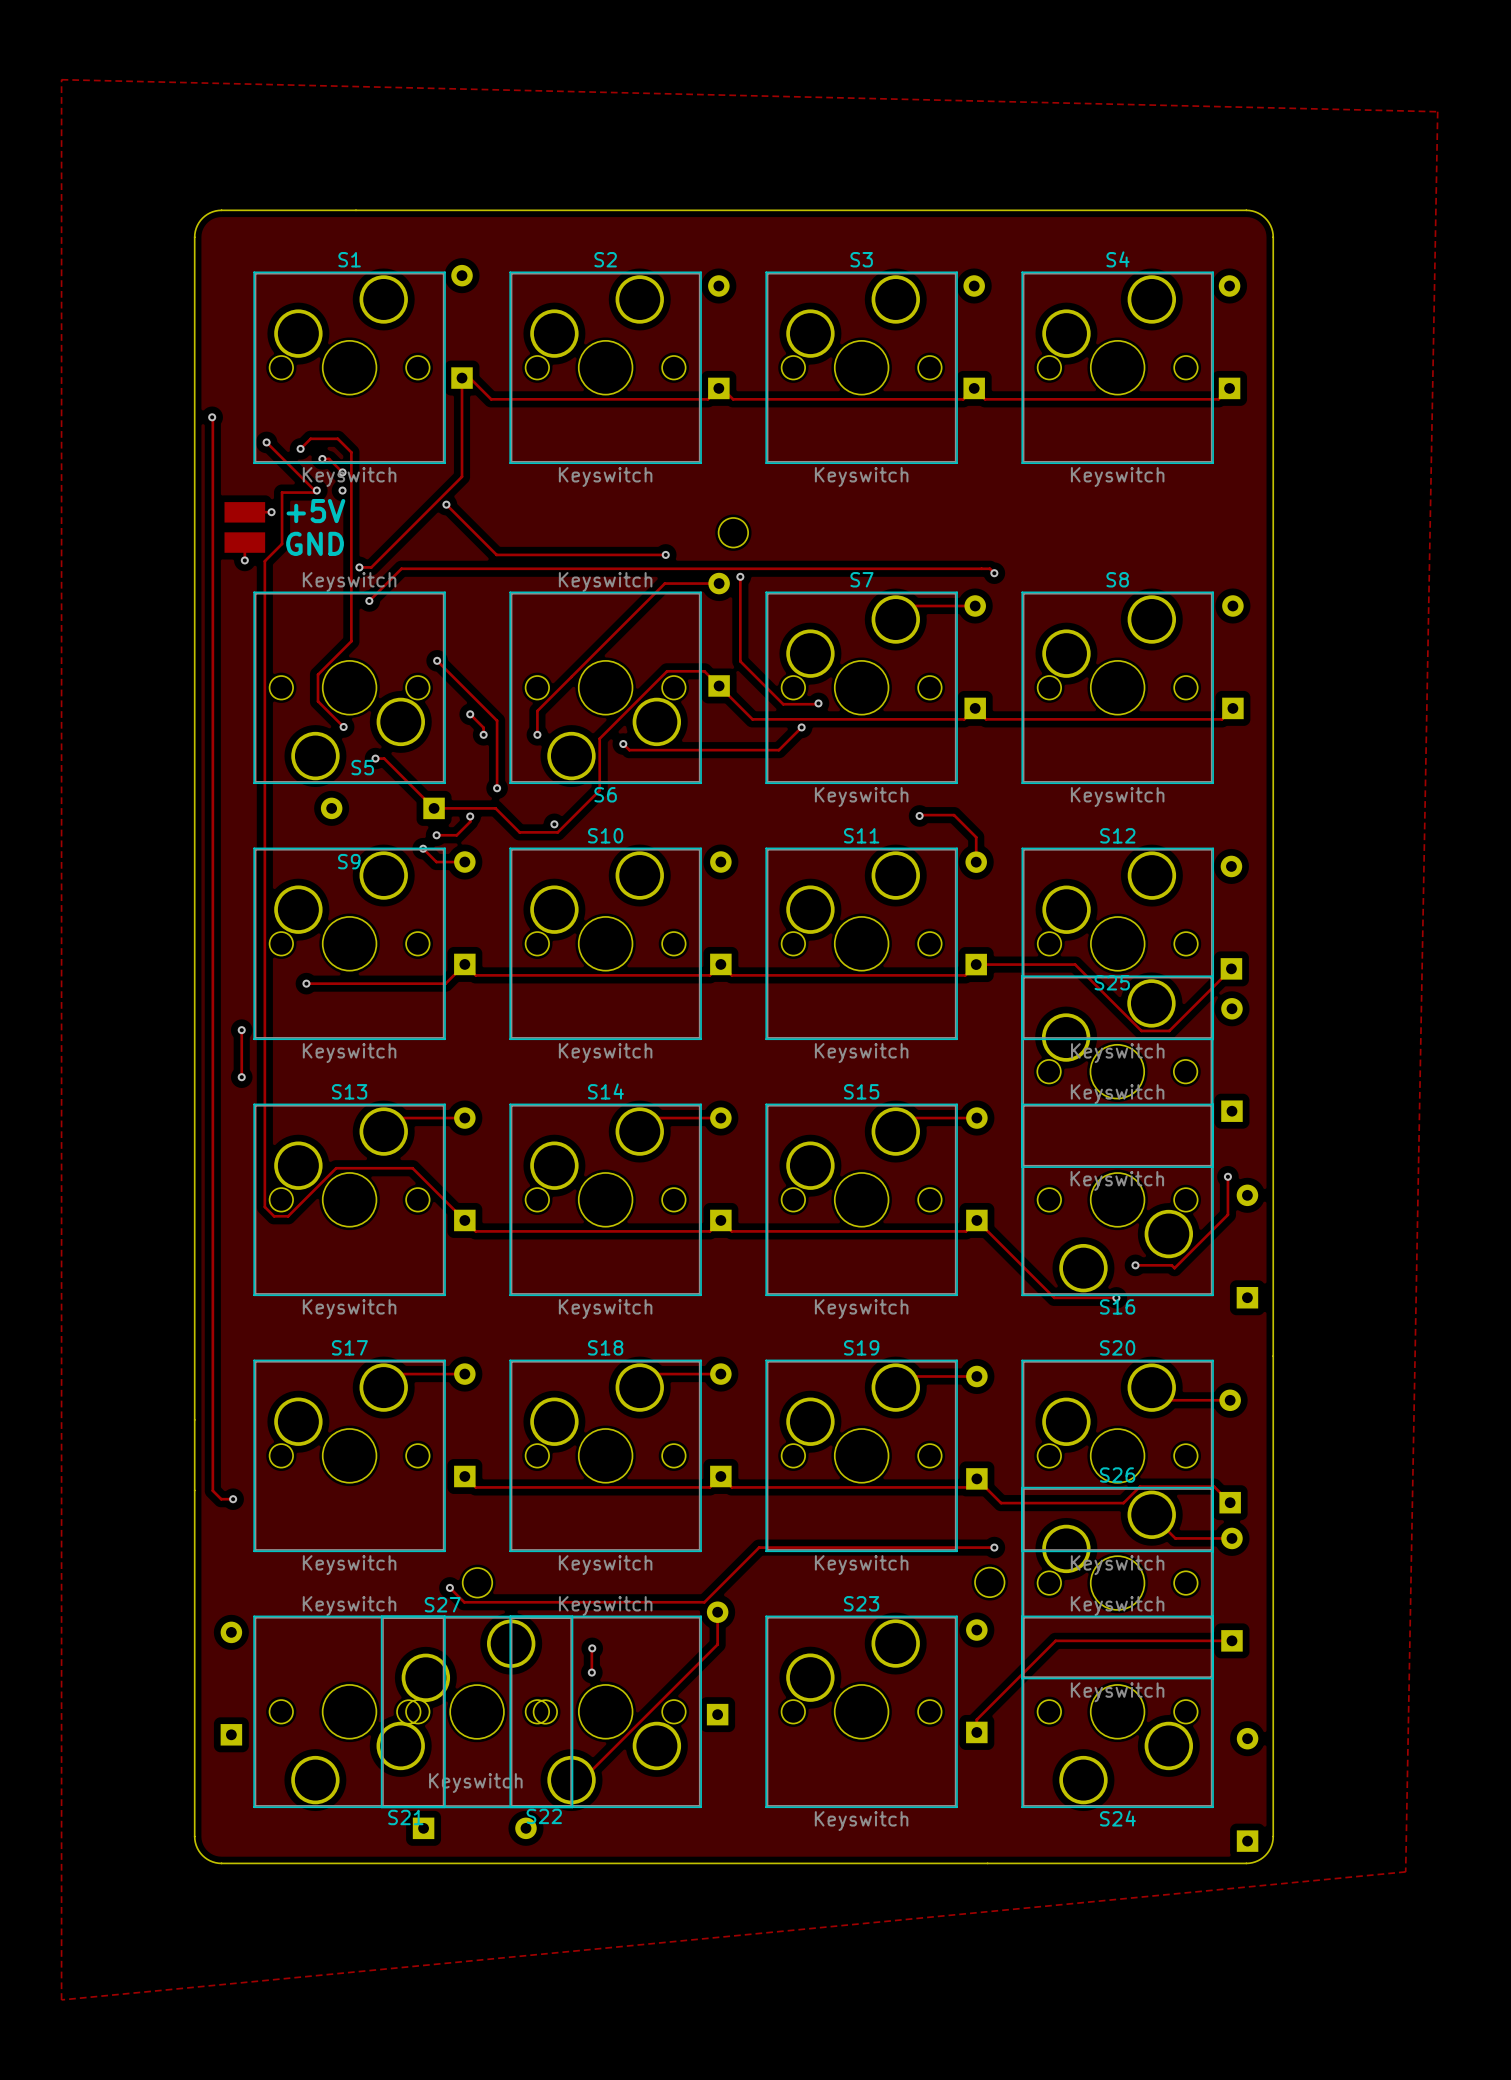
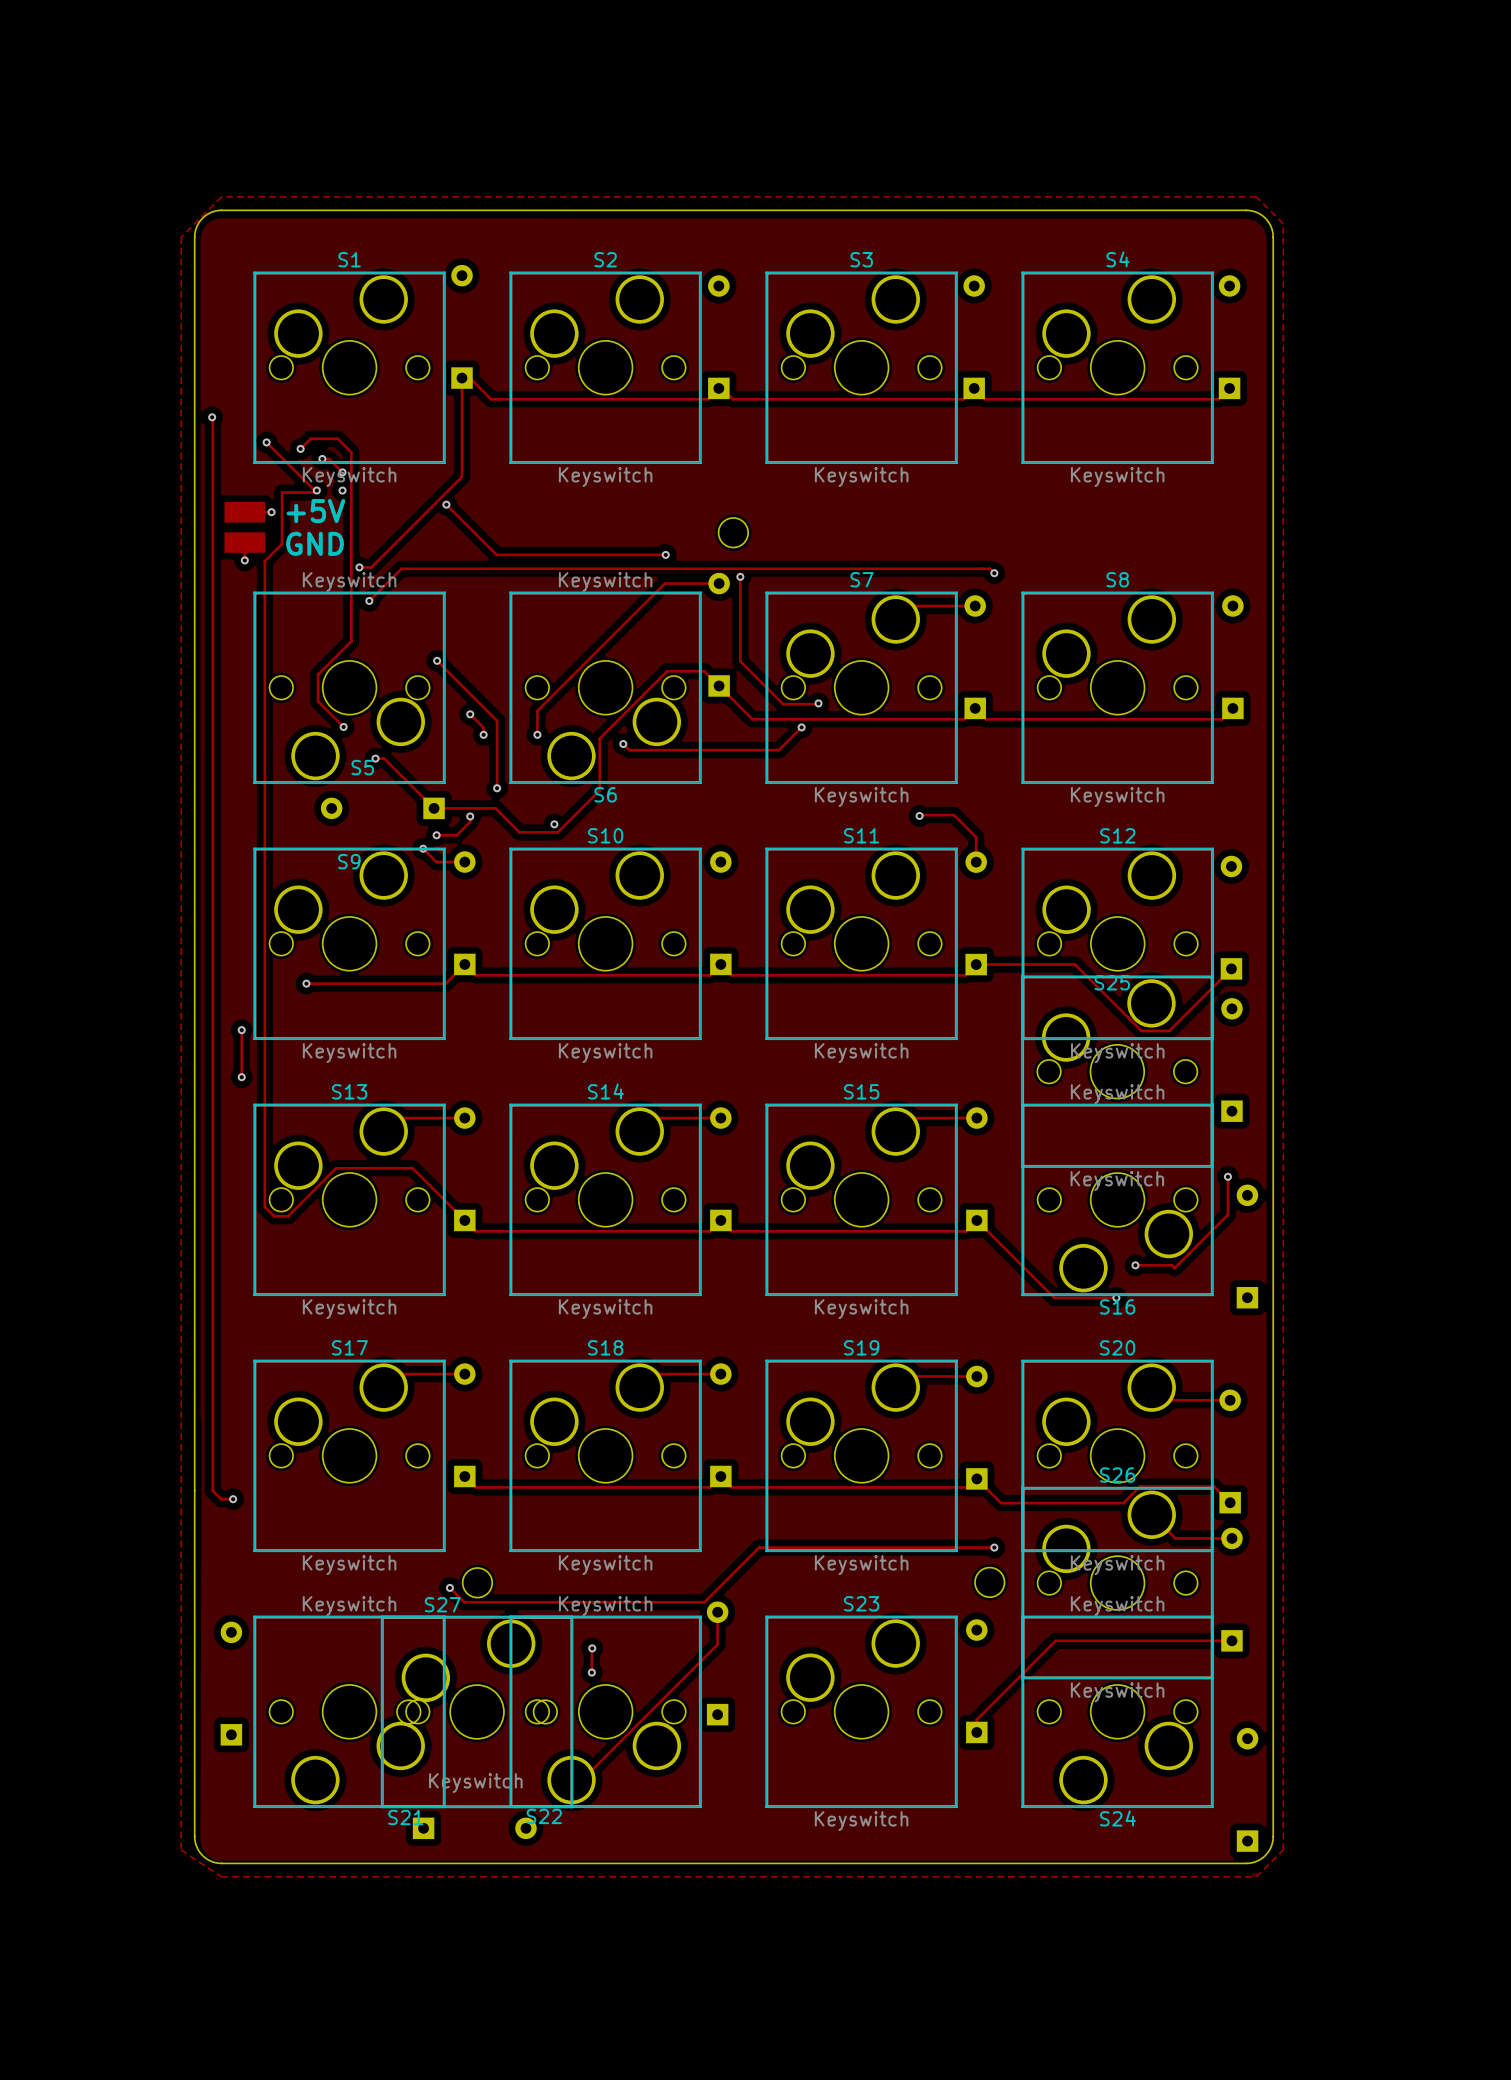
zone outline: (61, 79) (1437, 111) (1405, 1871) (61, 1999) (61, 79) -> (221, 196) (181, 237) (181, 1849) (221, 1876) (1256, 1876) (1283, 1849) (1283, 223) (1256, 196) (221, 196)

